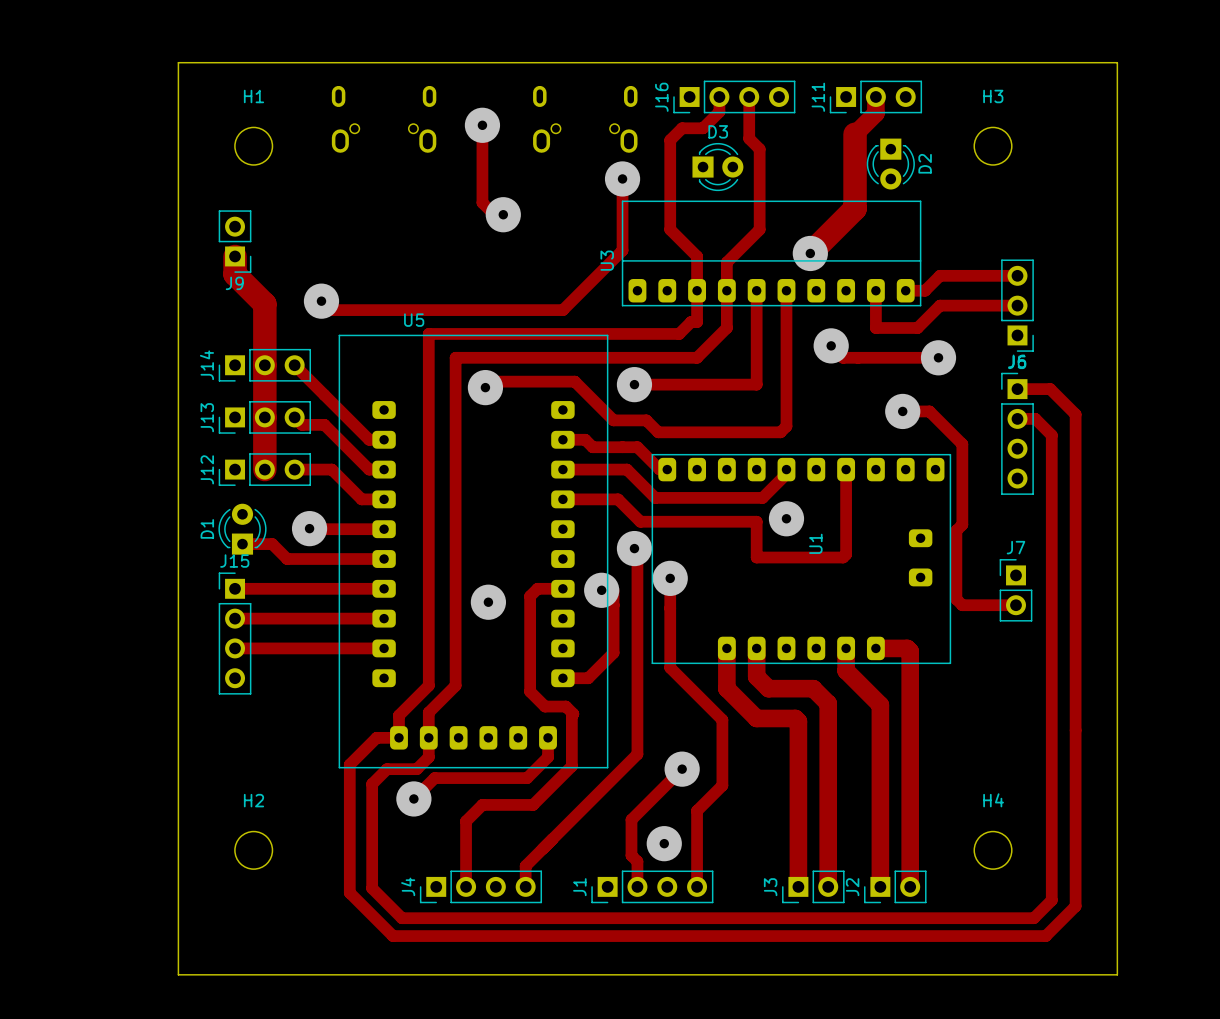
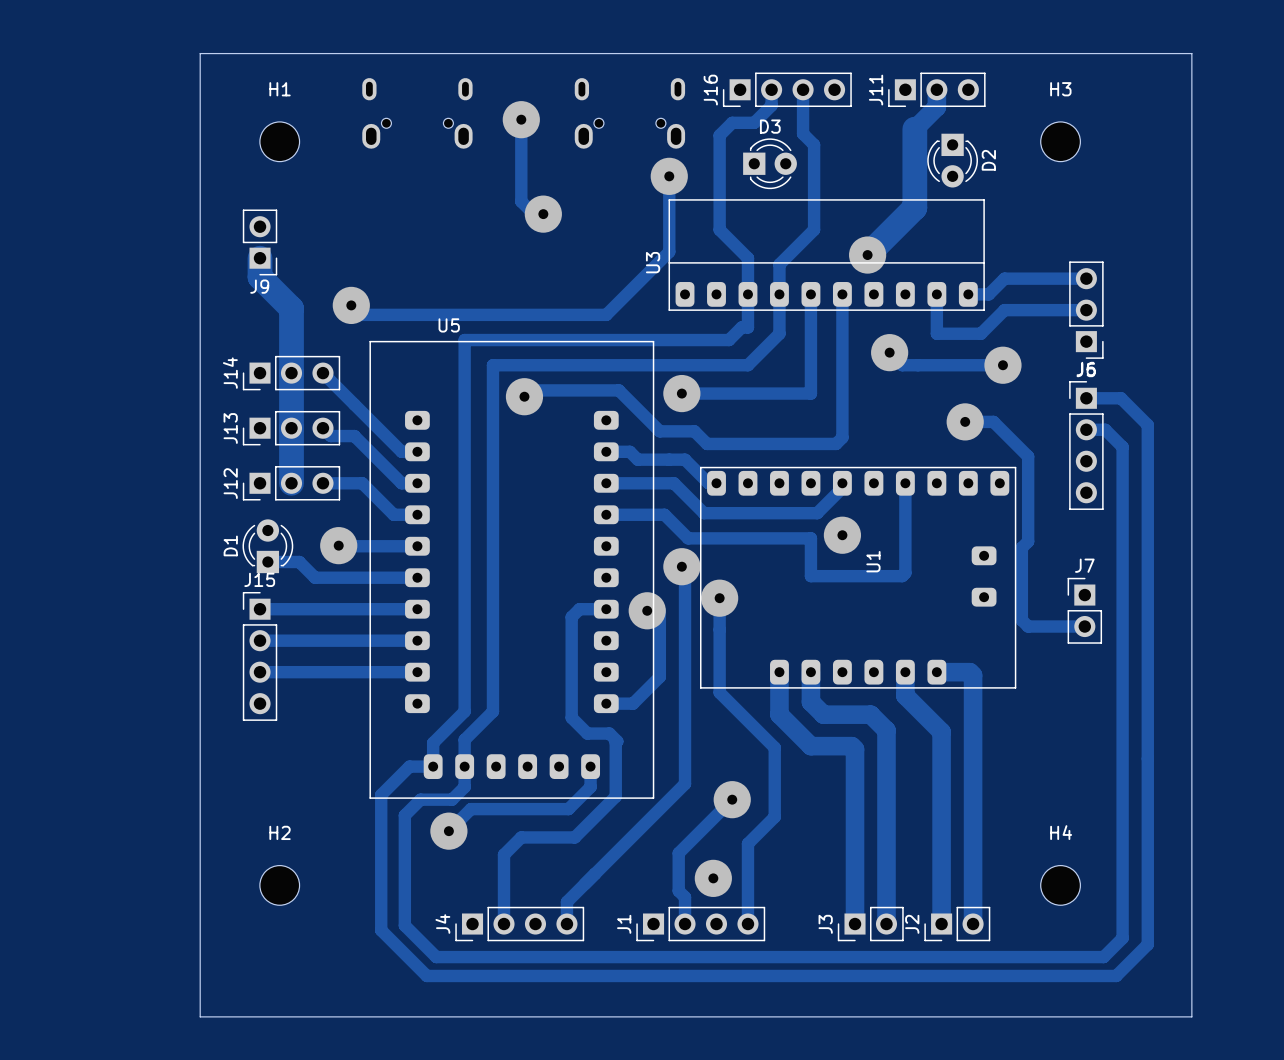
via: (488, 602) -> none

